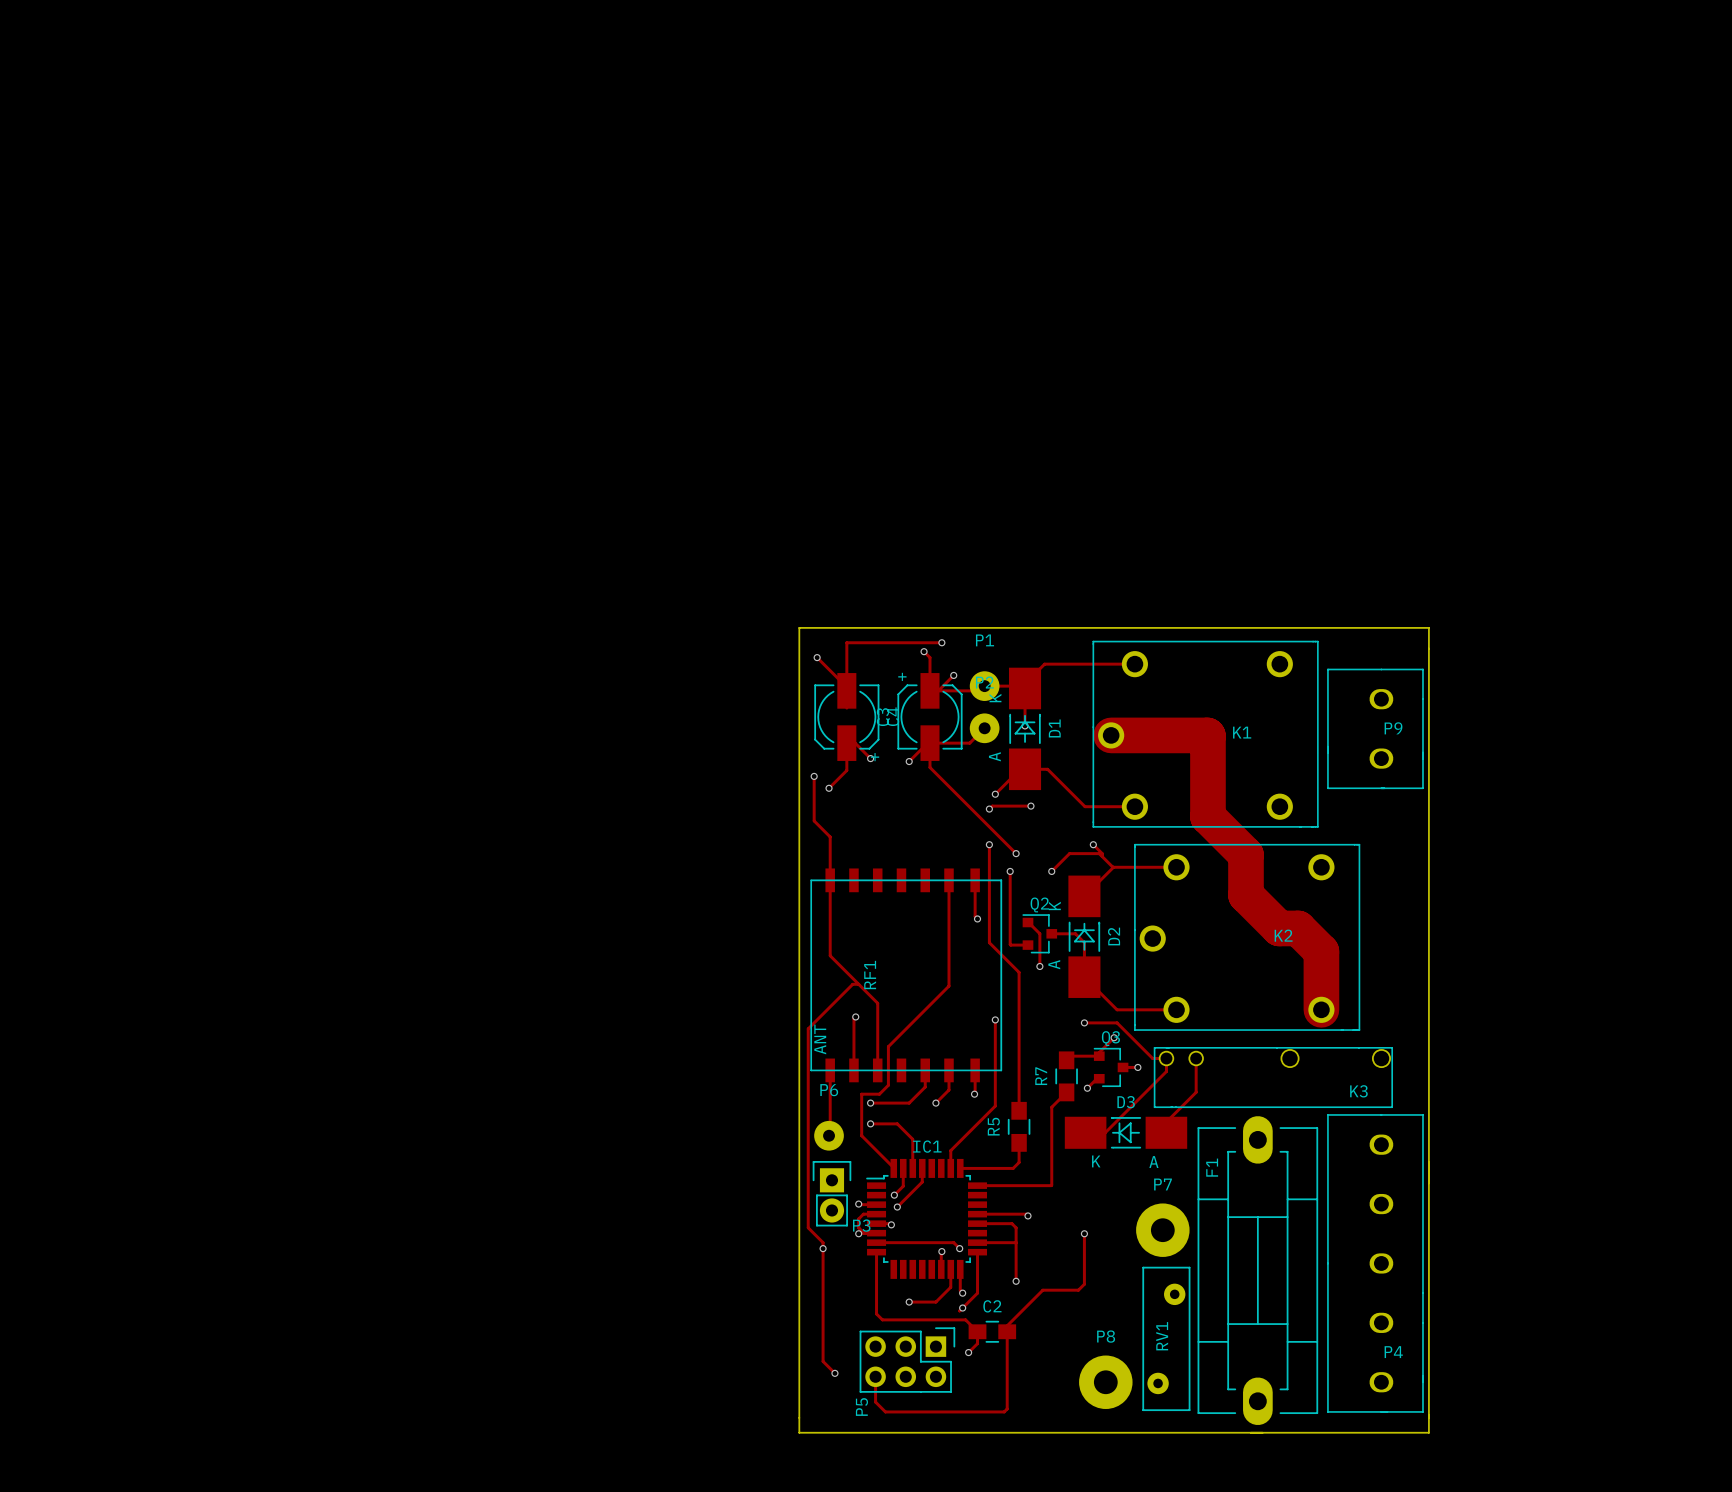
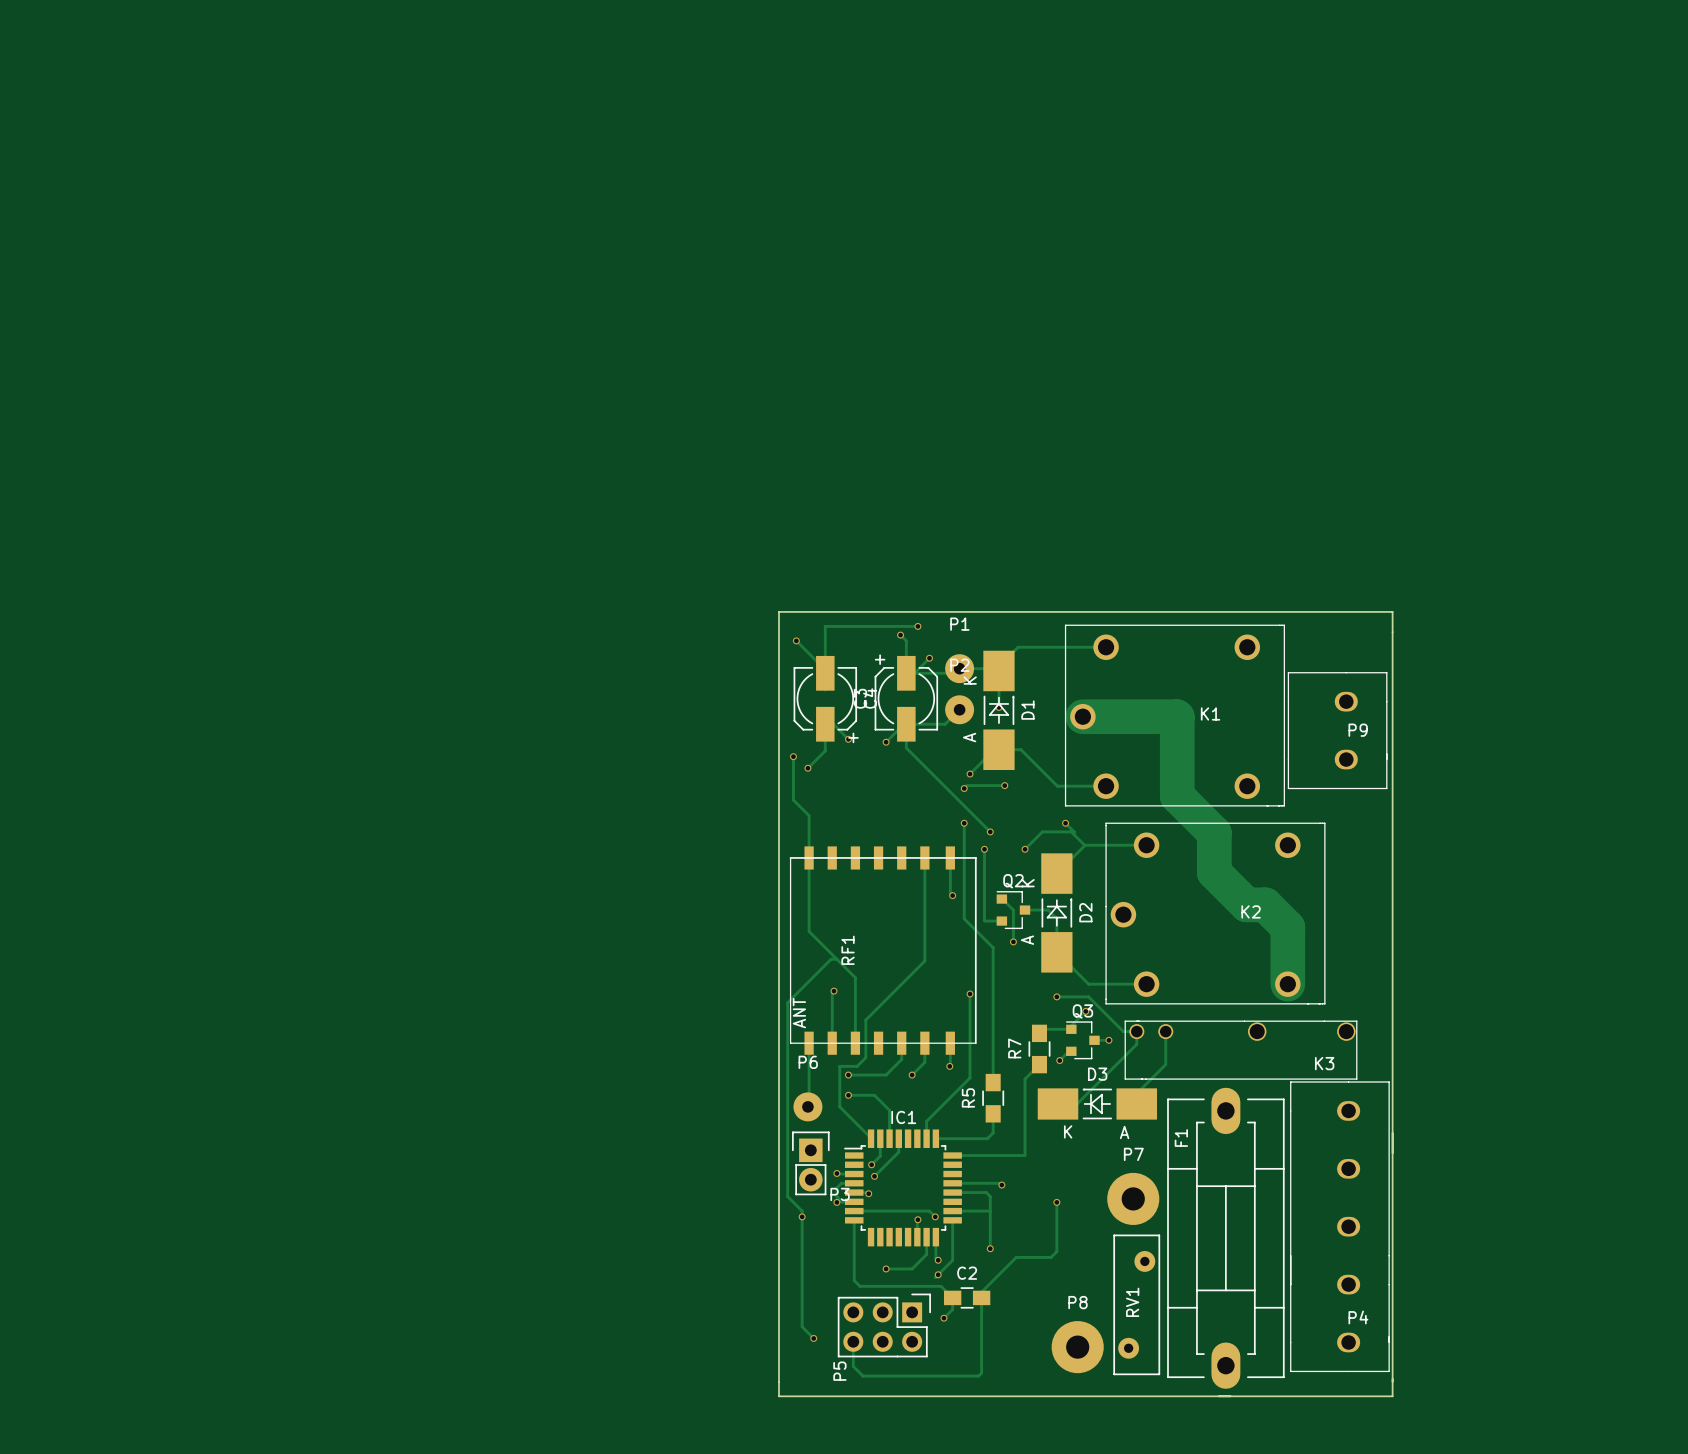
P9 footprint: [1327, 668, 1424, 789] -> [1287, 672, 1388, 790]
P4 footprint: [1327, 1114, 1424, 1413] -> [1290, 1081, 1390, 1373]

